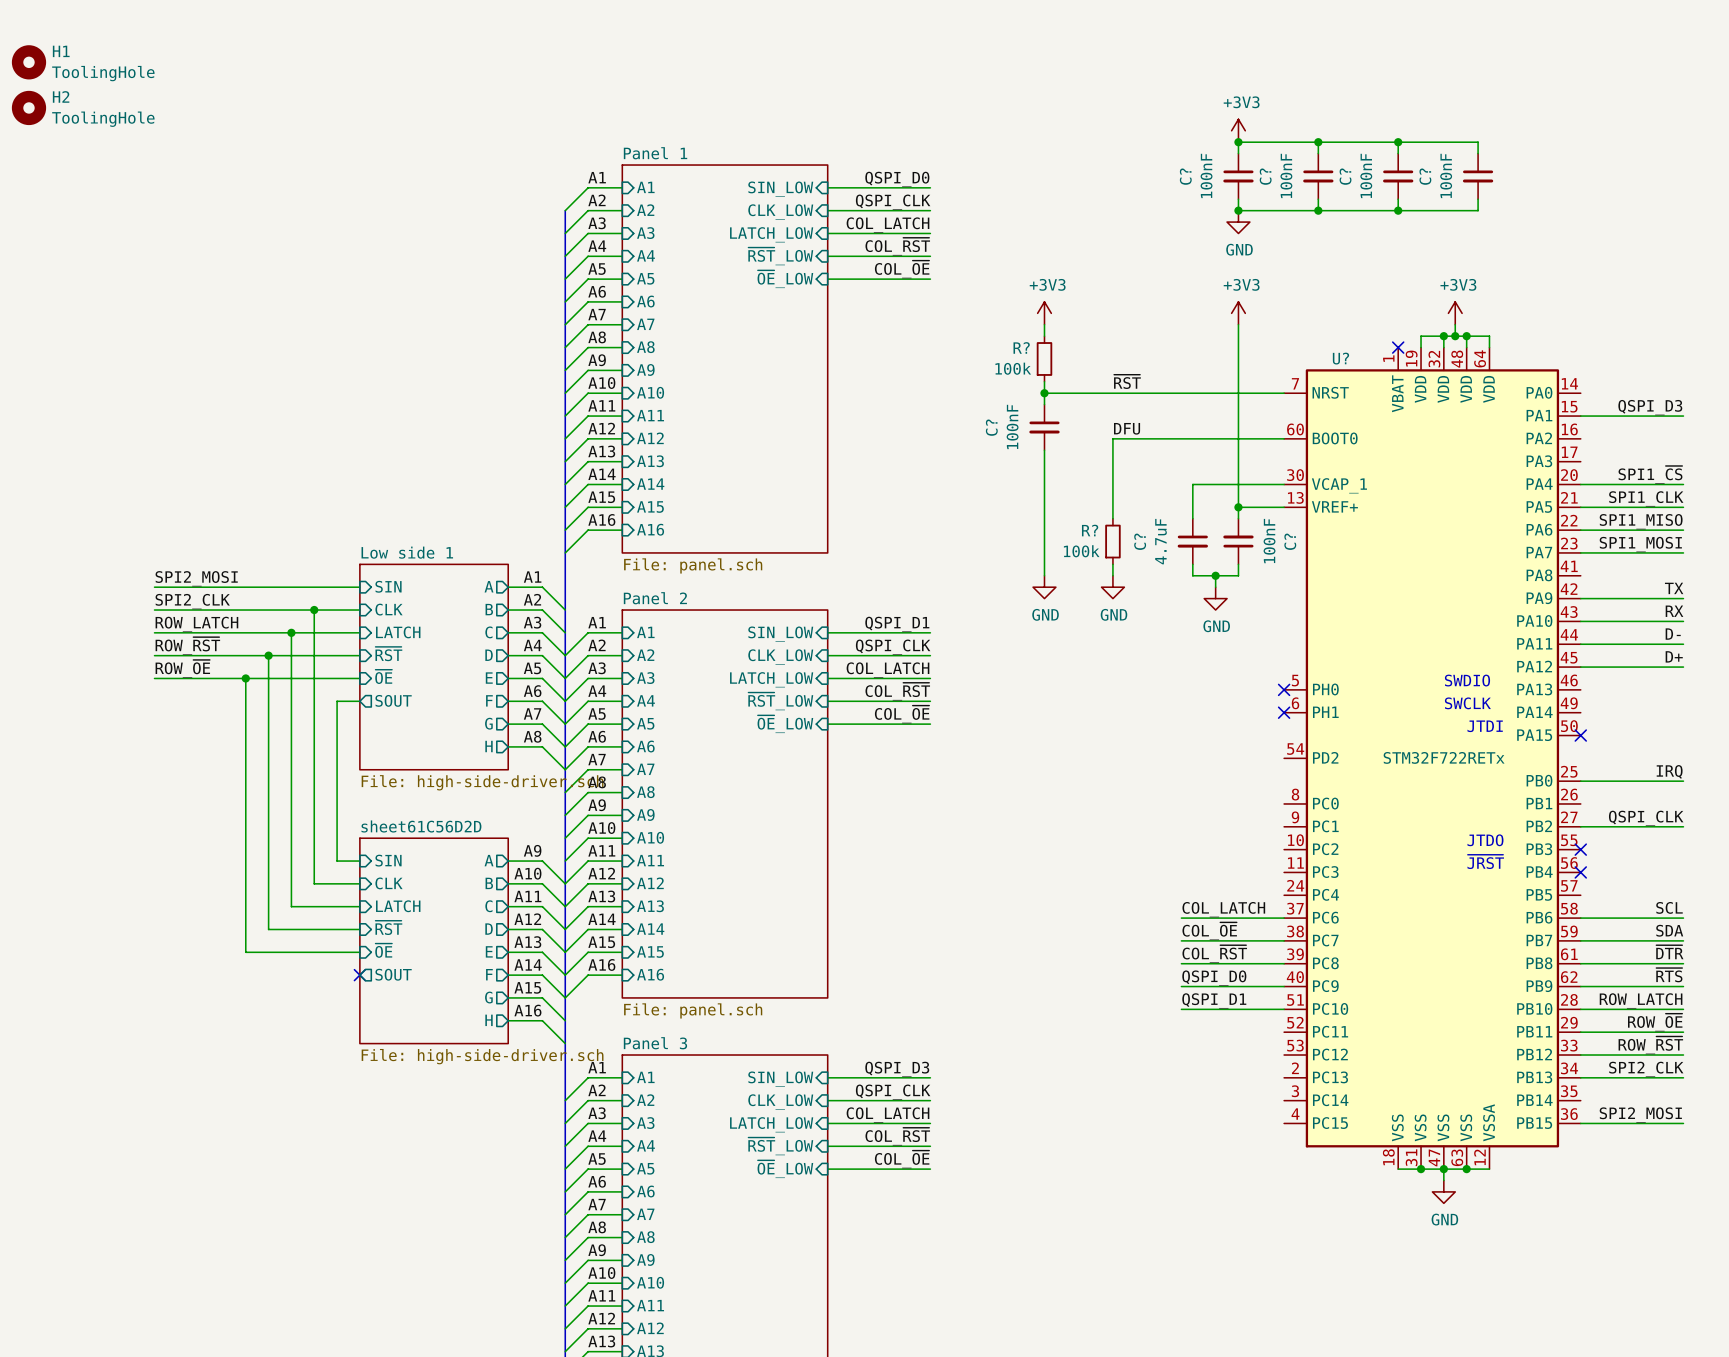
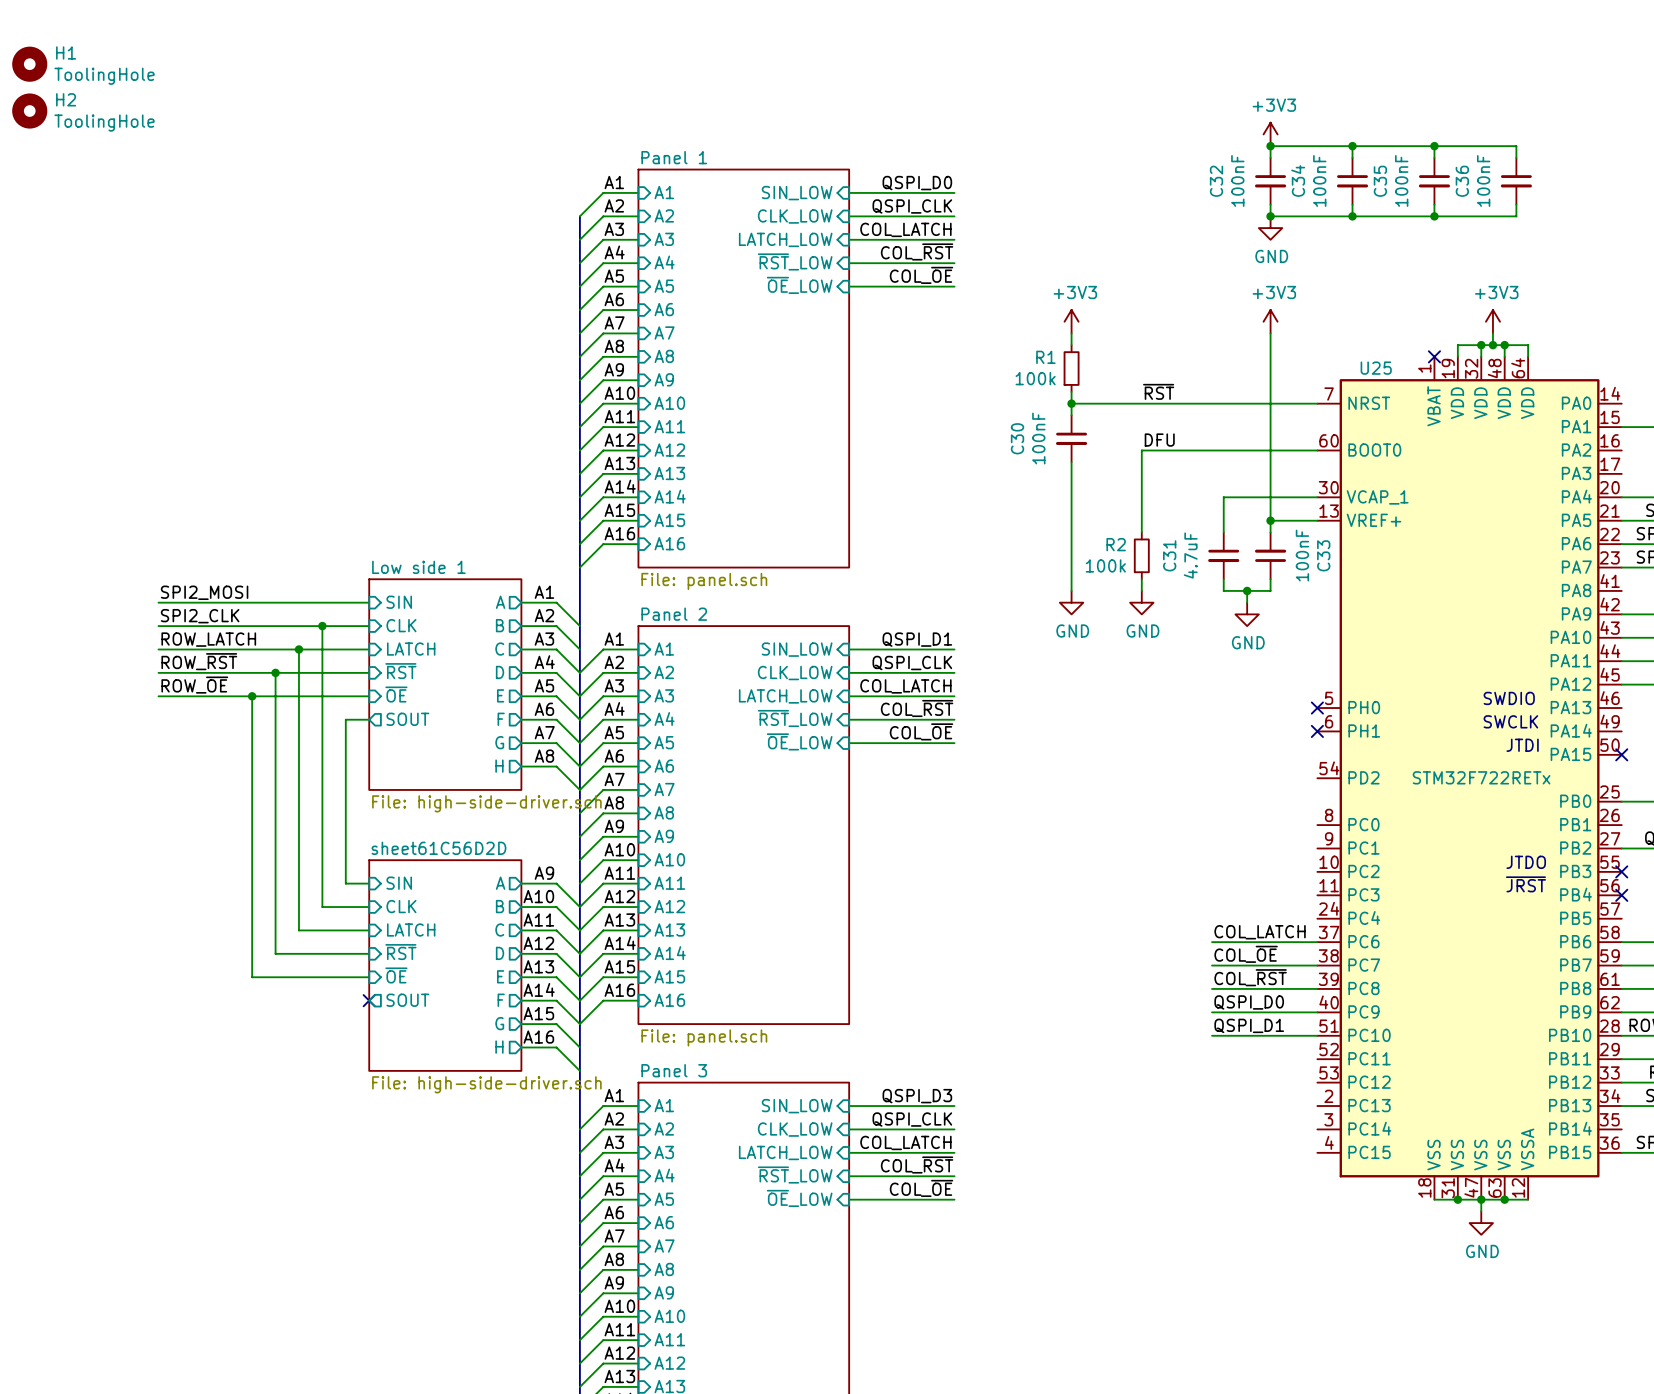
C? name: C? (1185, 176) -> C32 (1216, 181)
C? name: C? (1265, 176) -> C34 (1298, 180)
C? name: C? (1345, 176) -> C35 (1380, 181)
C? name: C? (1425, 176) -> C36 (1462, 181)
R? name: R? (1021, 347) -> R1 (1045, 357)
U? name: U? (1340, 358) -> U25 (1376, 368)
C? name: C? (991, 427) -> C30 (1017, 438)
R? name: R? (1090, 530) -> R2 (1116, 544)
C? name: C? (1140, 541) -> C31 (1169, 555)
C? name: C? (1290, 541) -> C33 (1323, 555)

